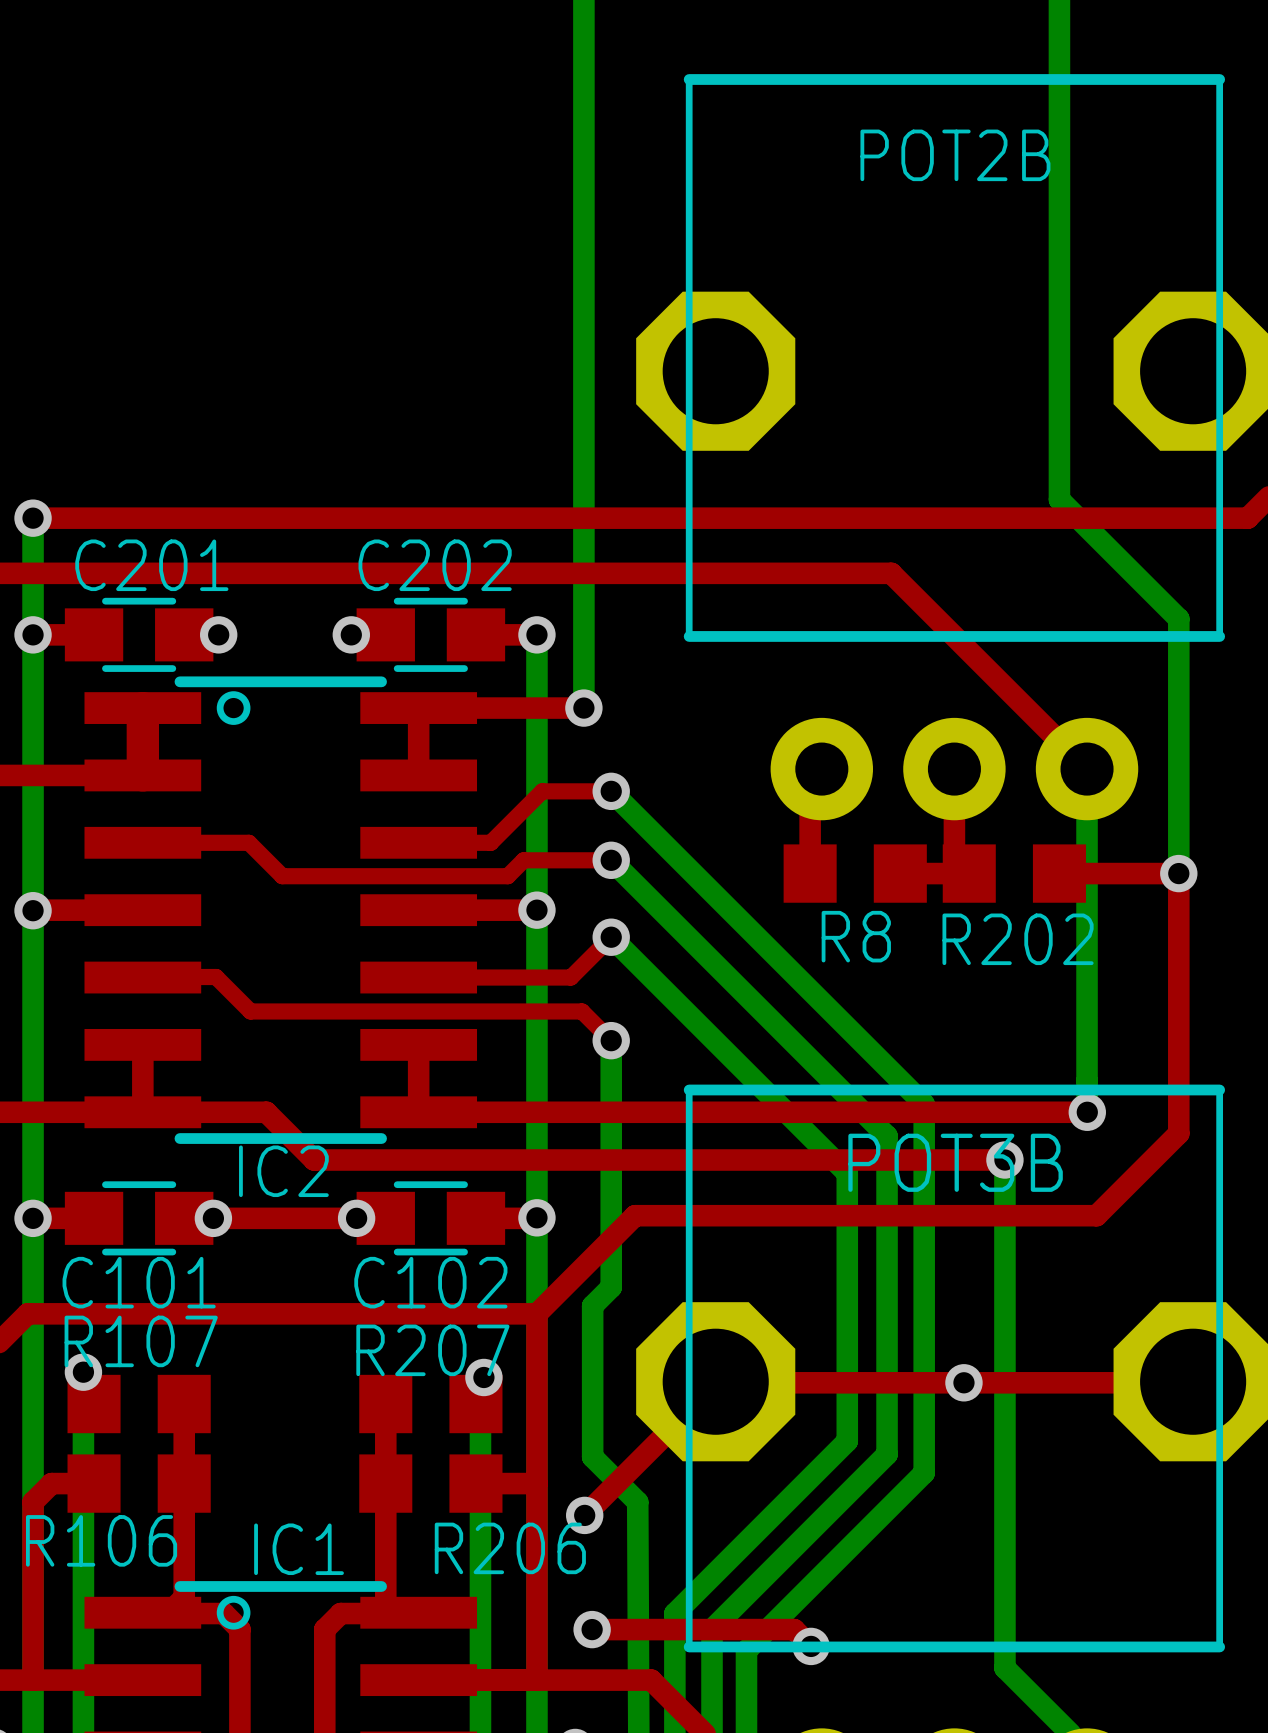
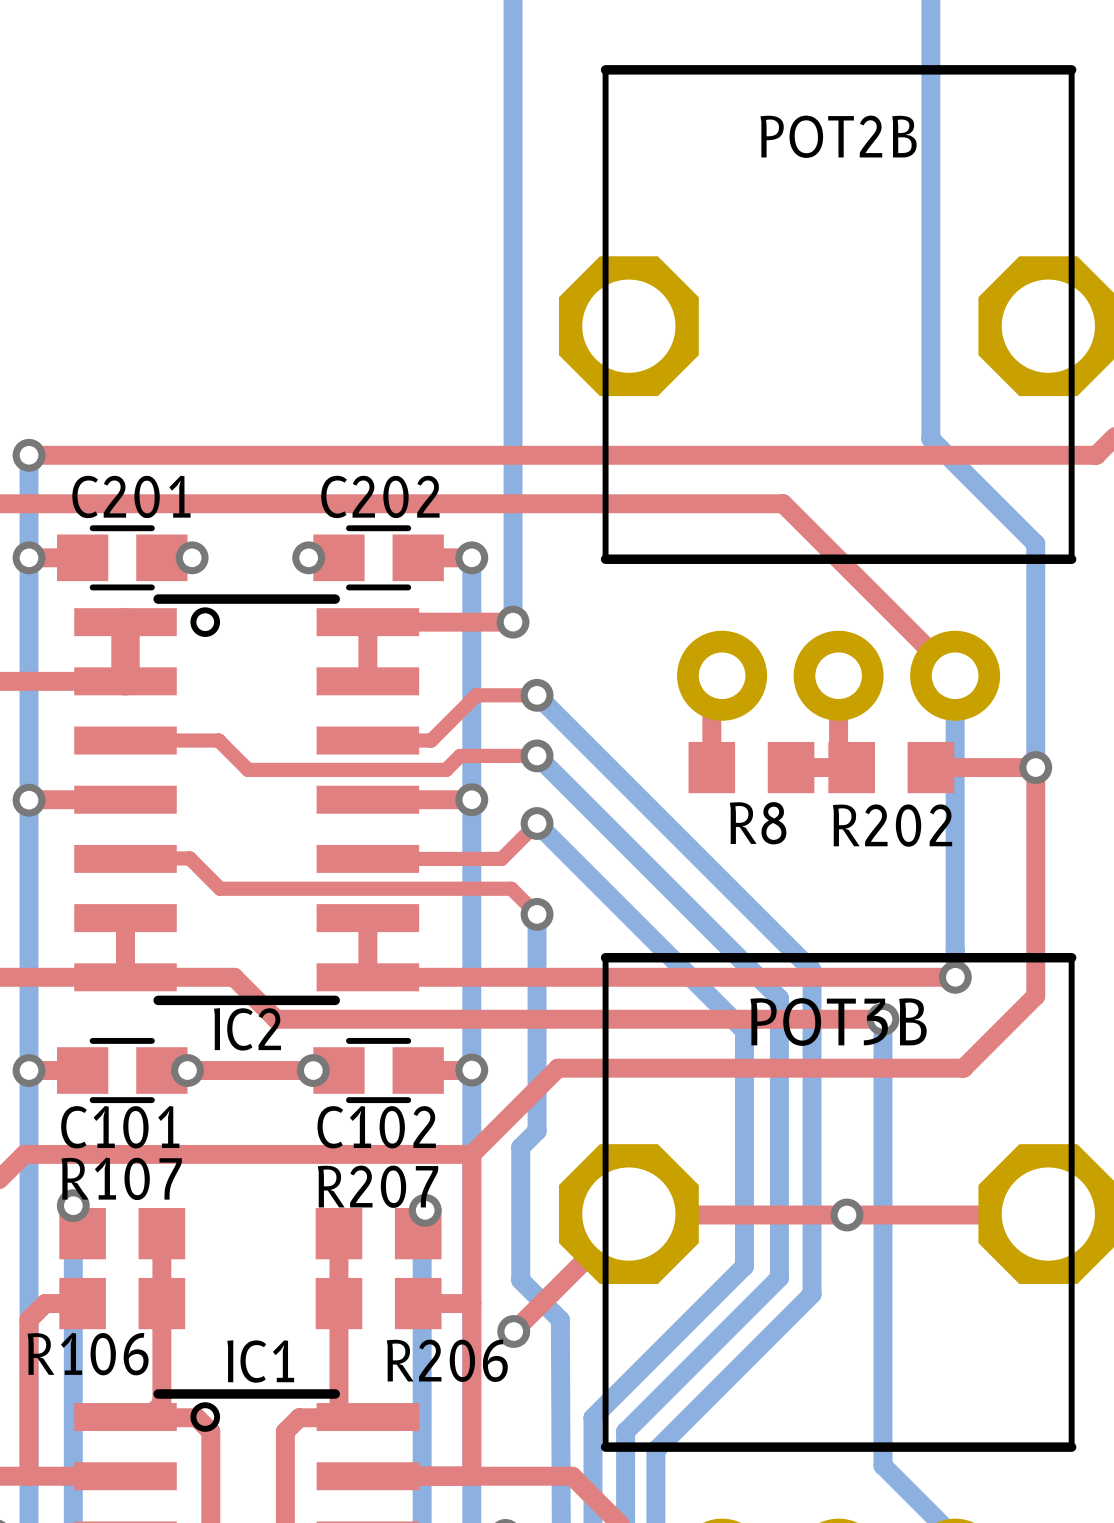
top track: (592, 1629) (794, 1629) (811, 1646) -> none
via: (592, 1629) -> none
via: (811, 1646) -> none

